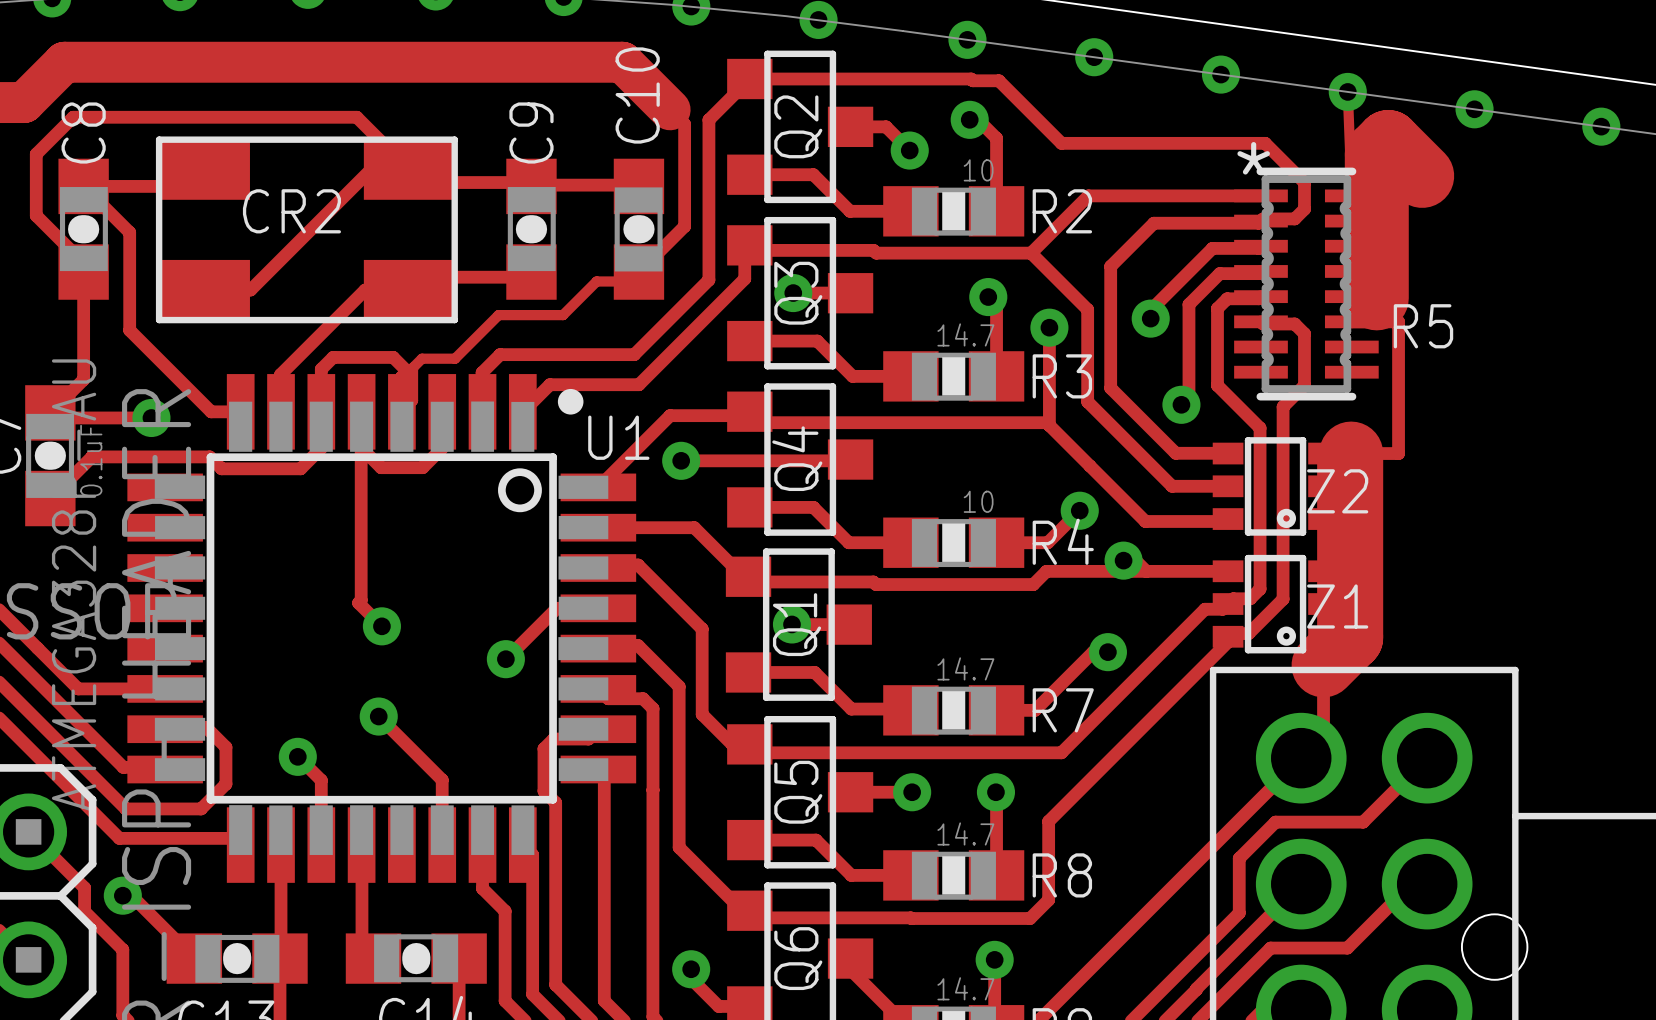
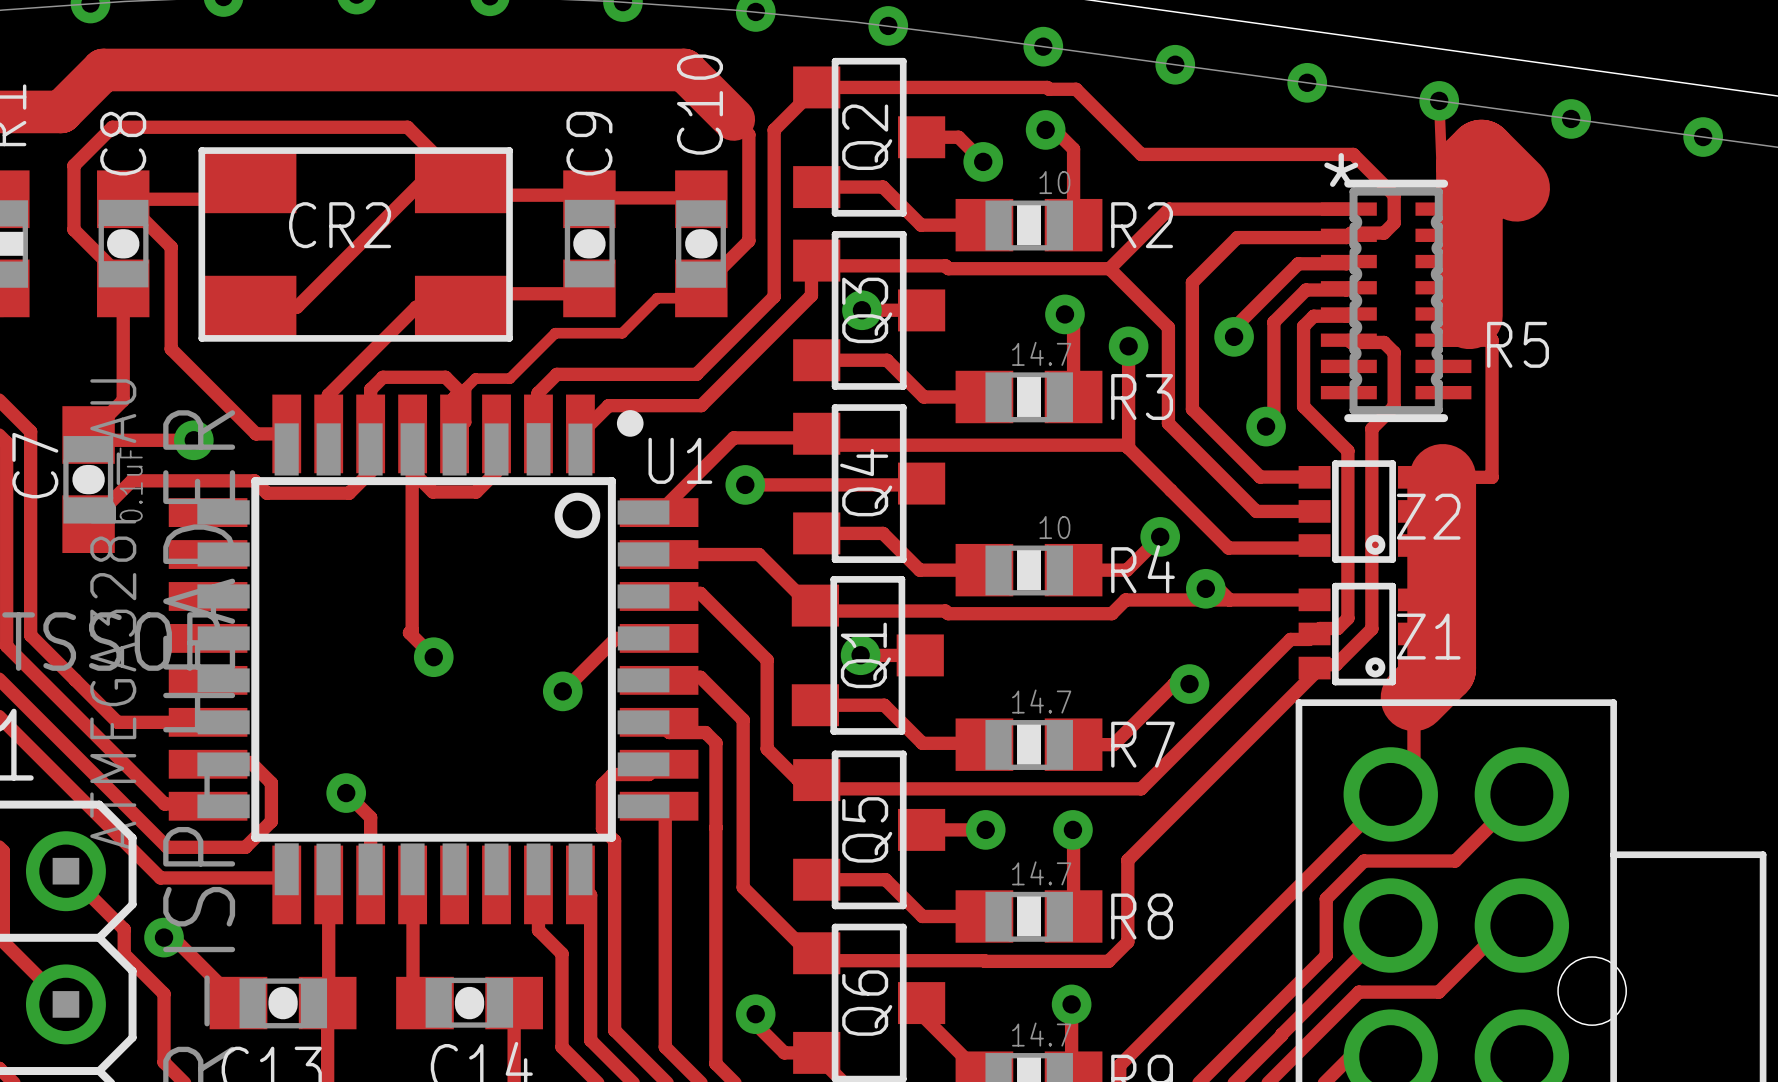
track: (378, 716) (442, 780) (442, 845) -> none
via: (378, 716) -> none

